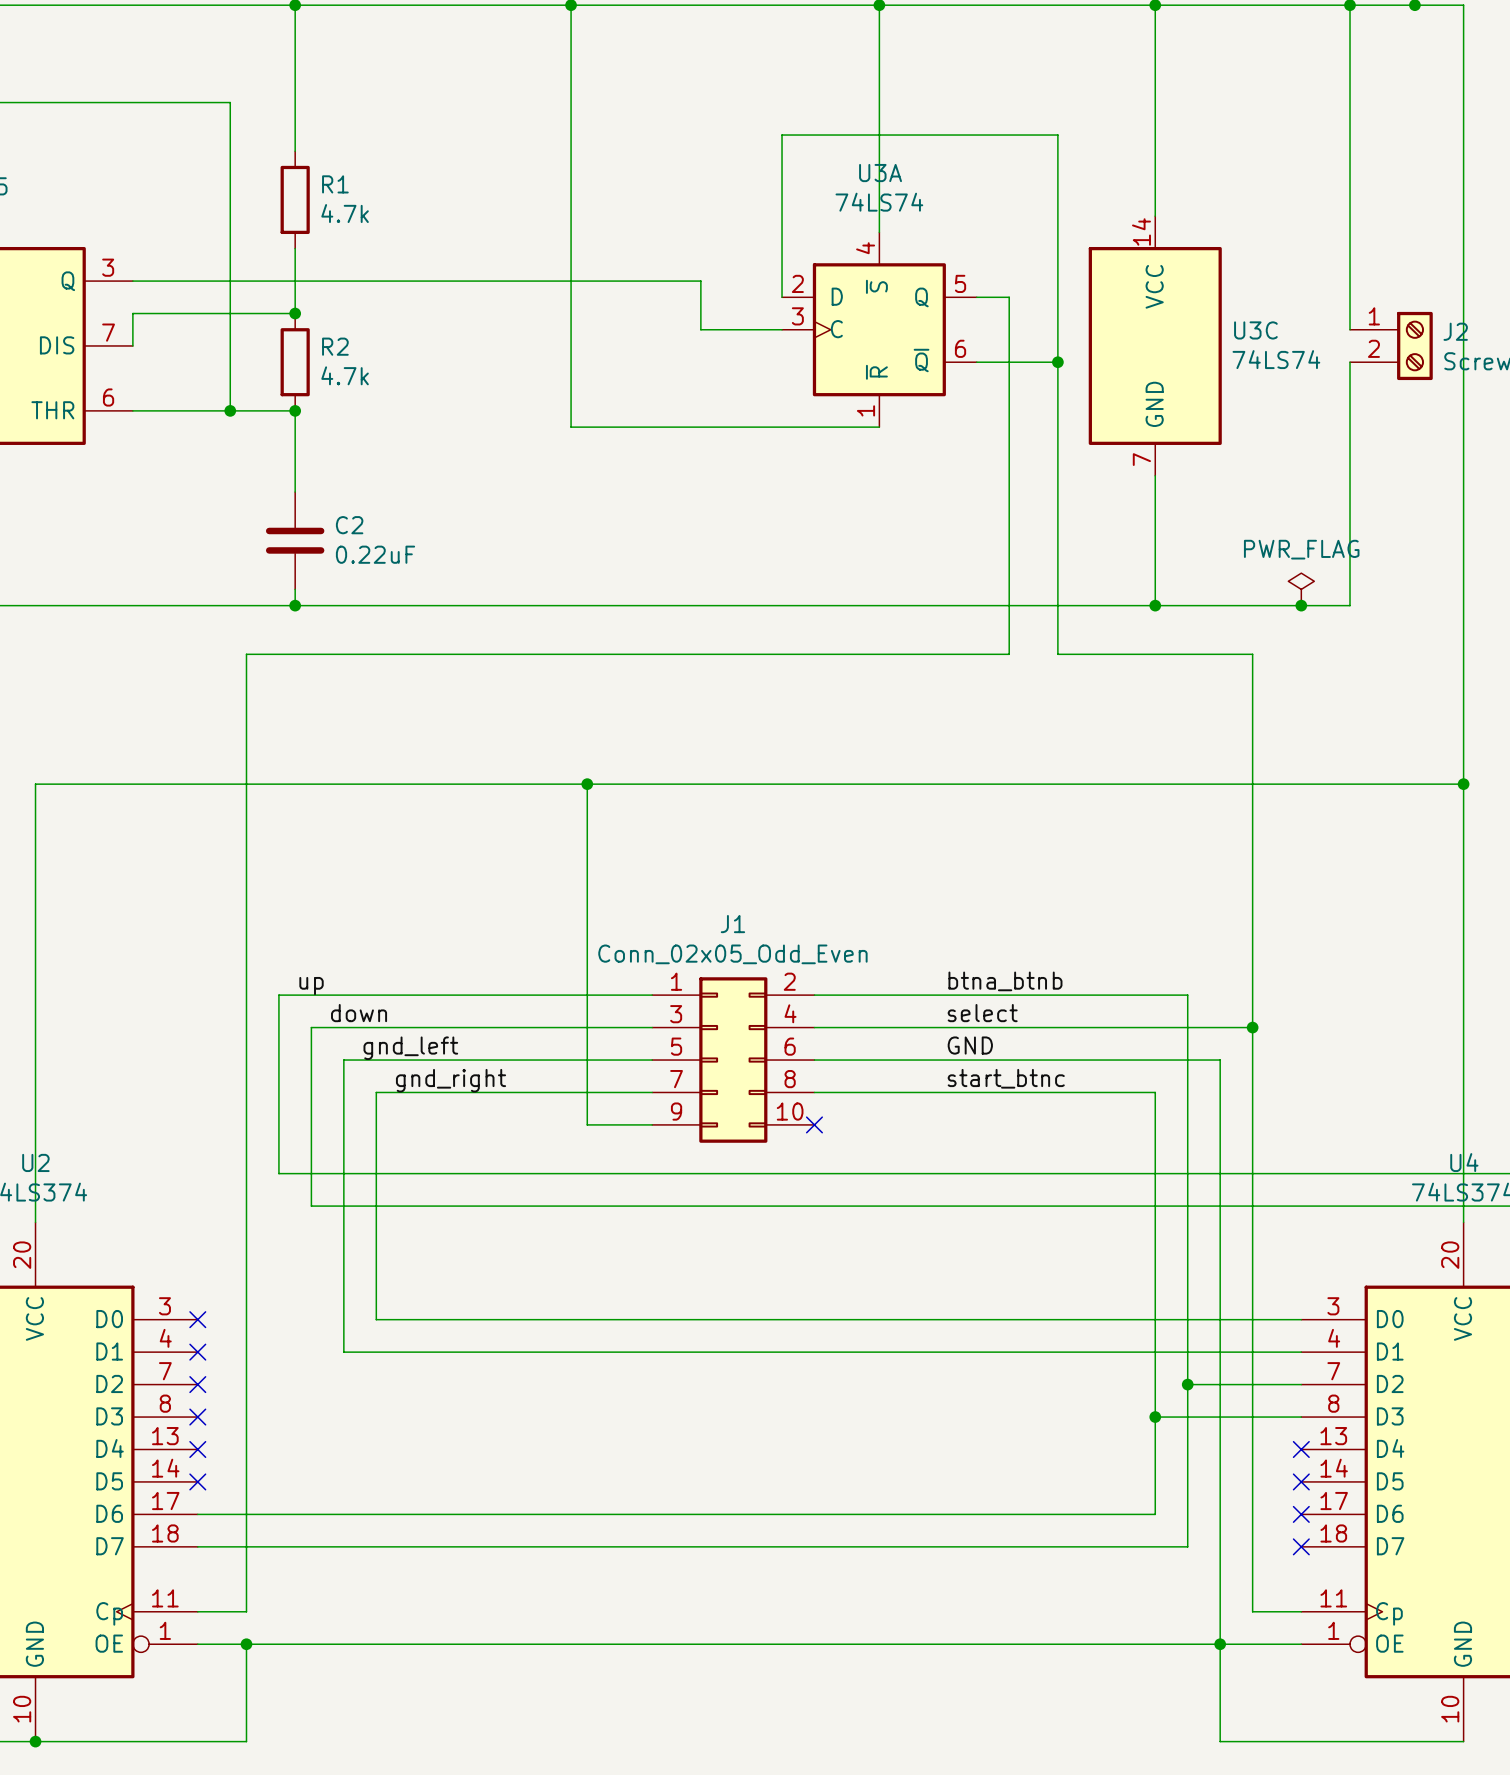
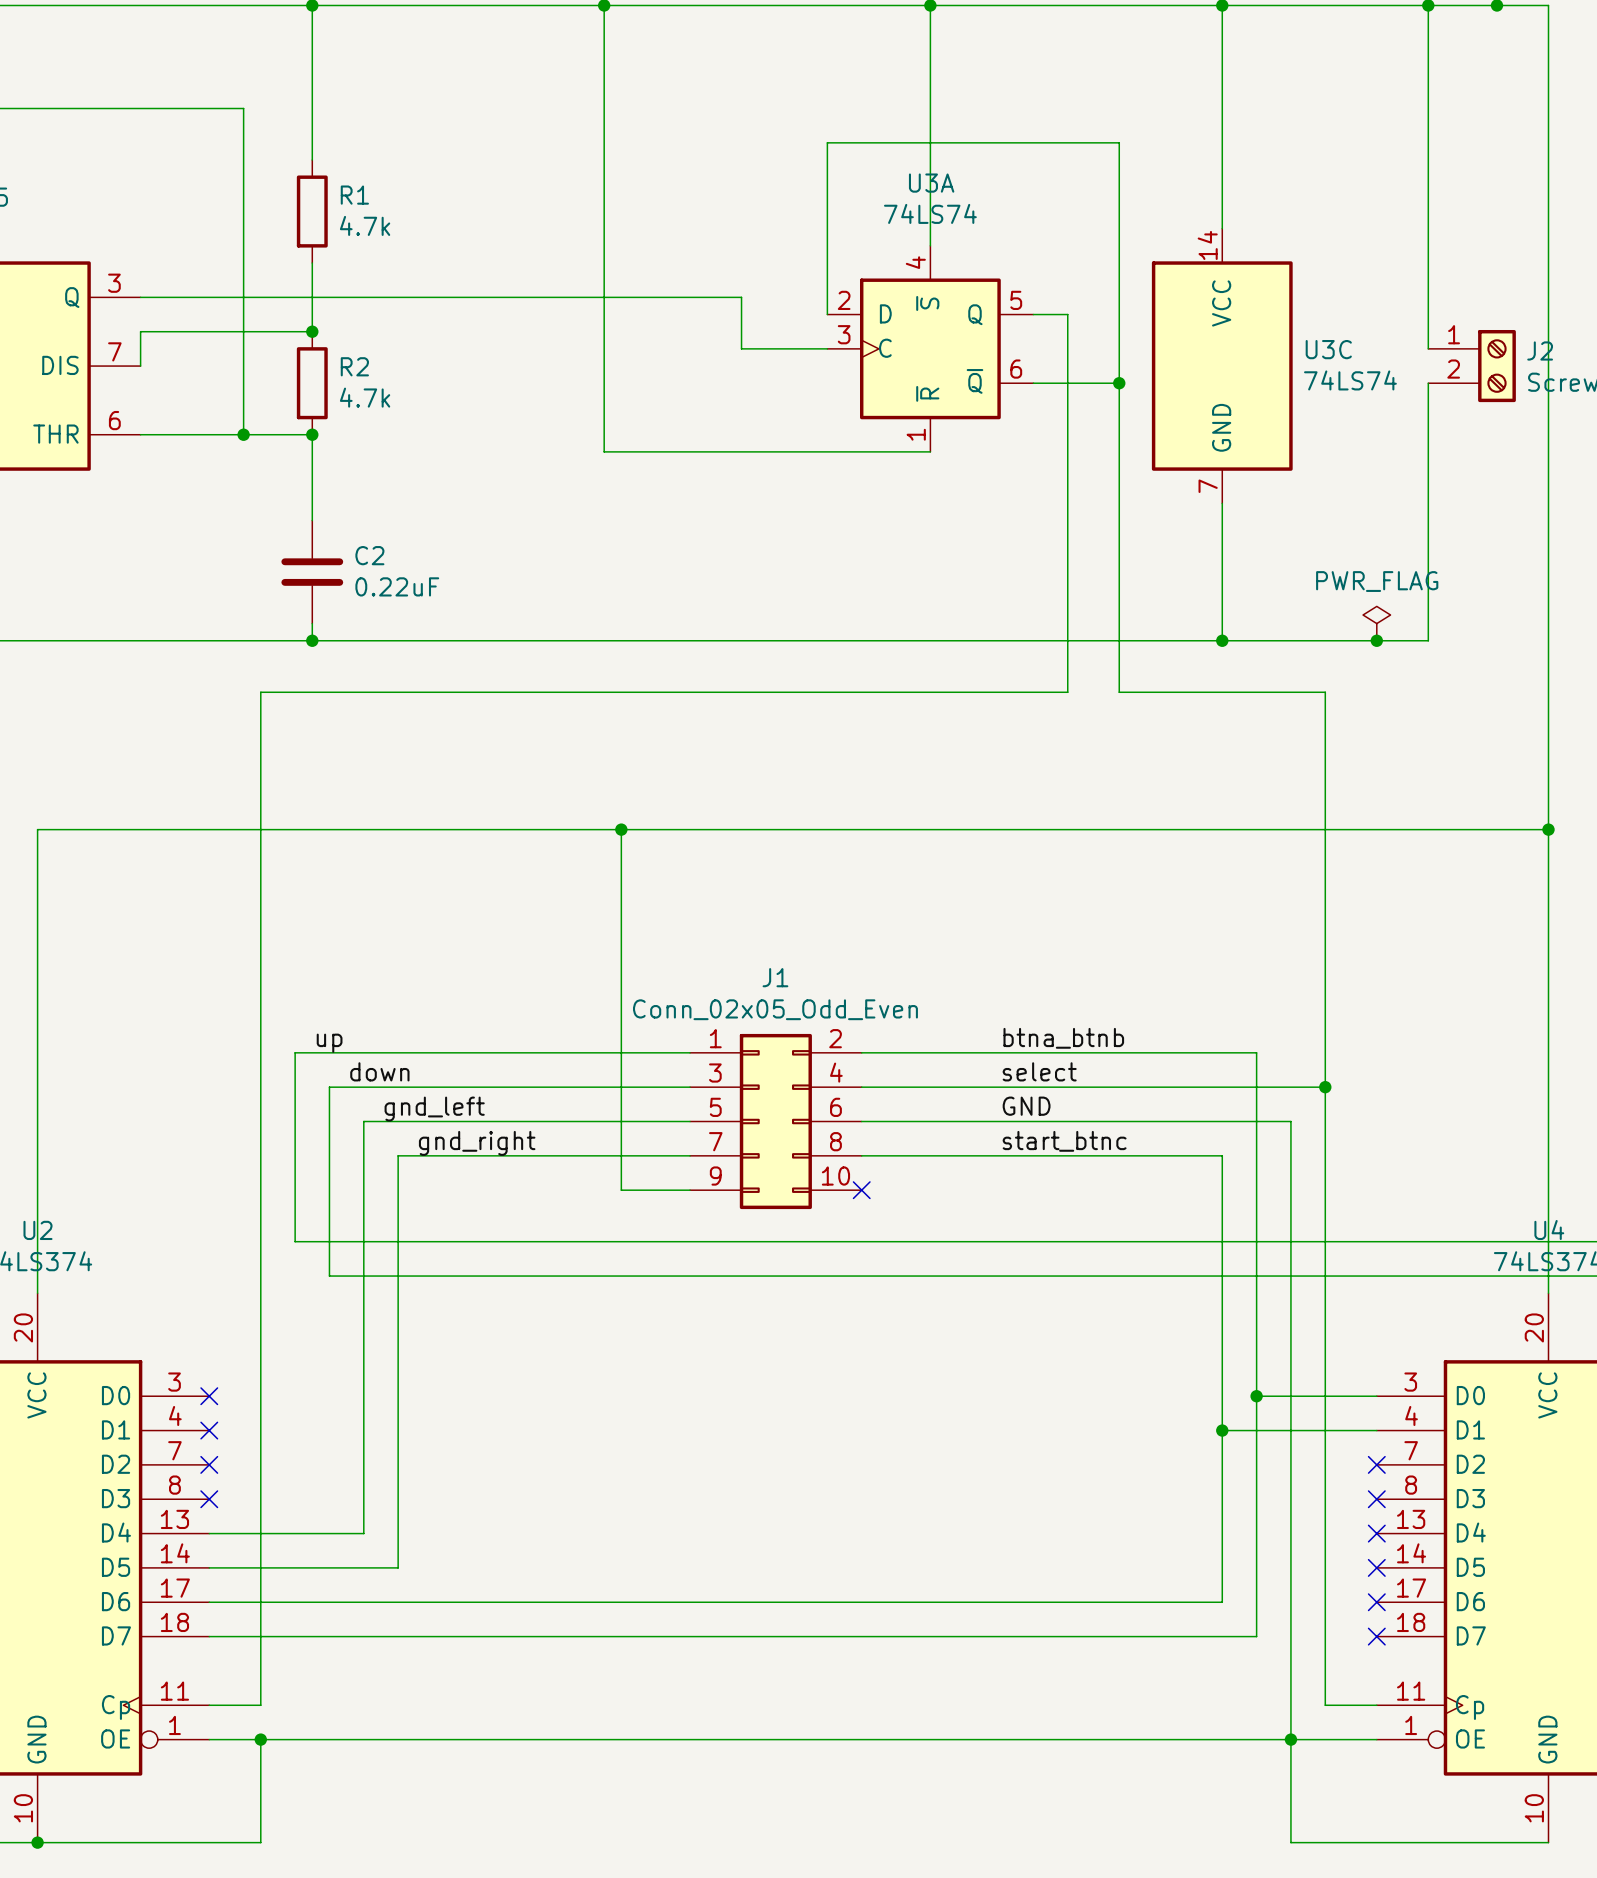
wire: (376, 1319) (1187, 1319) -> (398, 1396) (398, 1567) (209, 1567)
junction: none -> (1256, 1396)
wire: (343, 1352) (1155, 1352) -> (363, 1430) (363, 1533) (209, 1533)
junction: none -> (1222, 1430)
wire: (1187, 1384) (1301, 1384) -> none
junction: (1187, 1384) -> none
no-connect mark: none -> (1376, 1464)
wire: (1155, 1417) (1301, 1417) -> none
junction: (1155, 1417) -> none
no-connect mark: none -> (1376, 1499)
no-connect mark: (197, 1449) -> none
no-connect mark: (197, 1481) -> none

